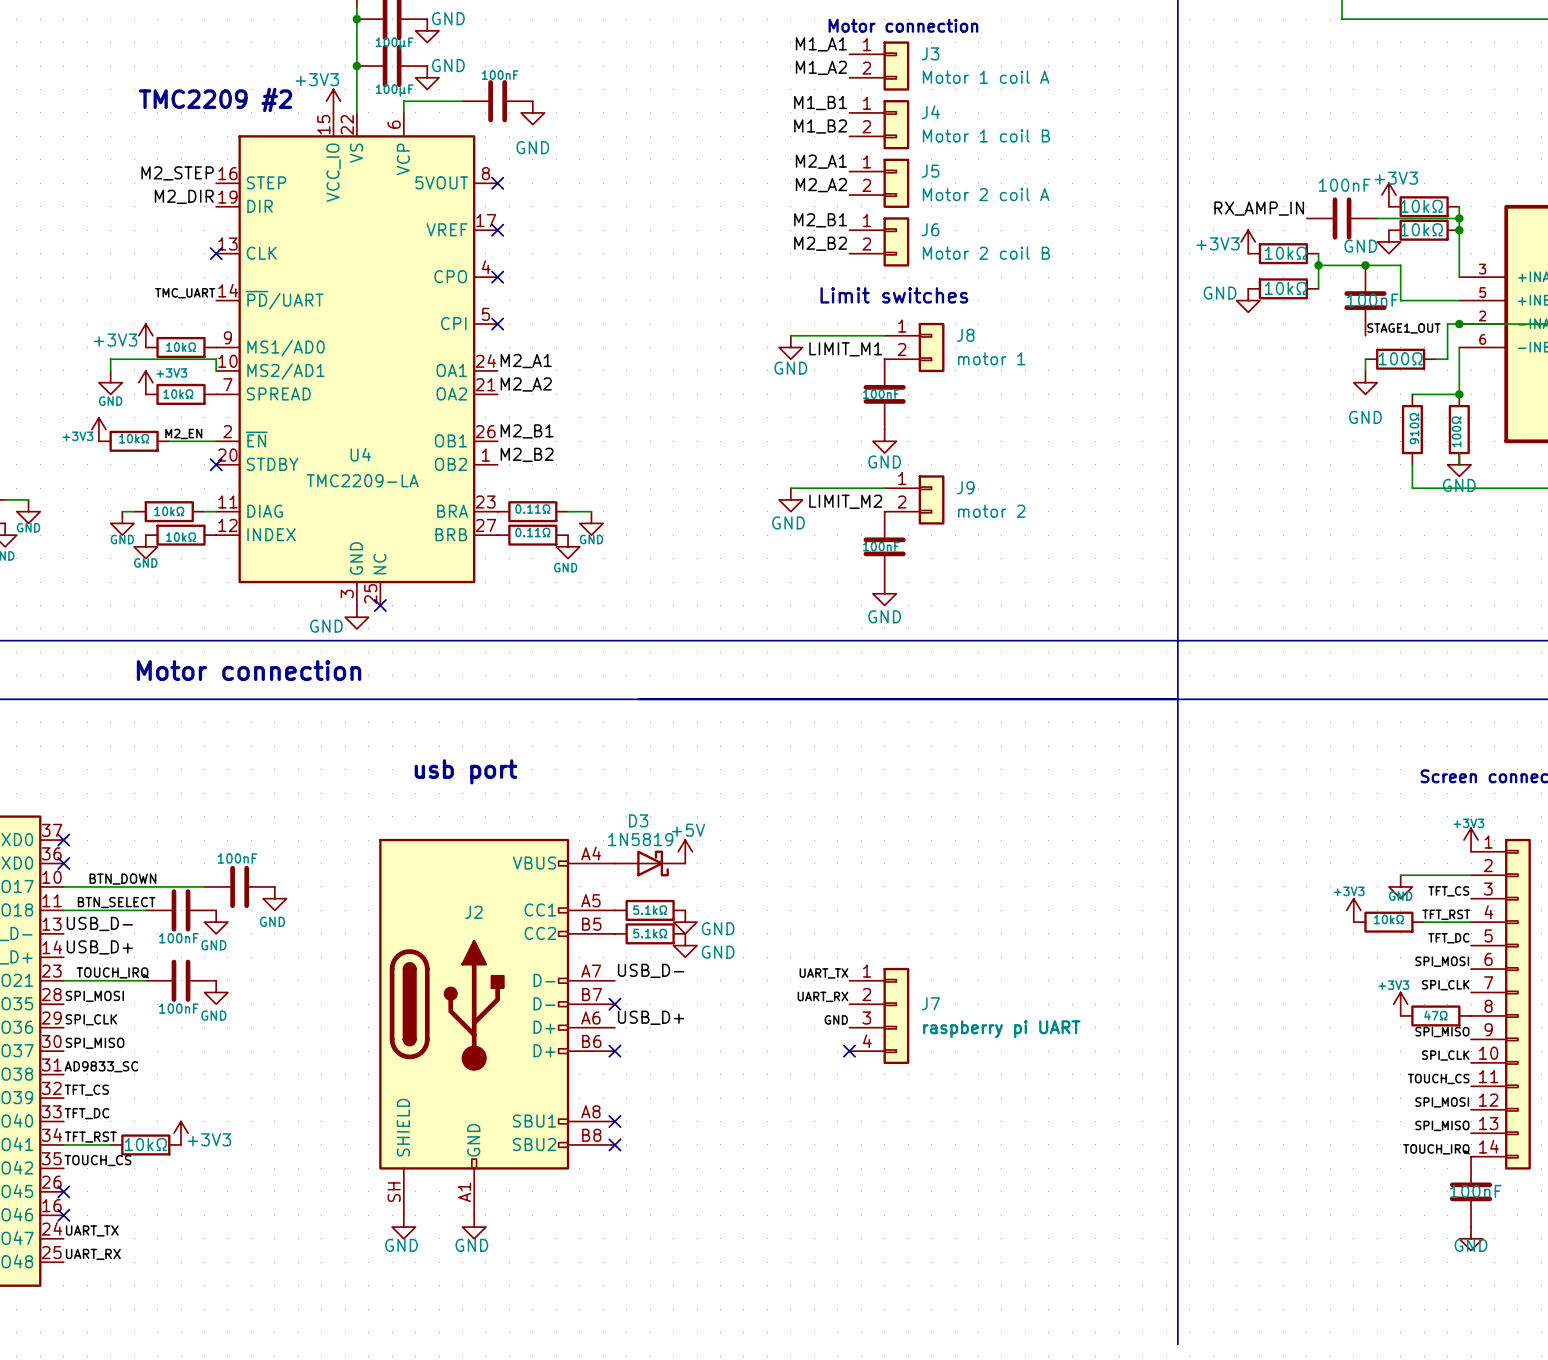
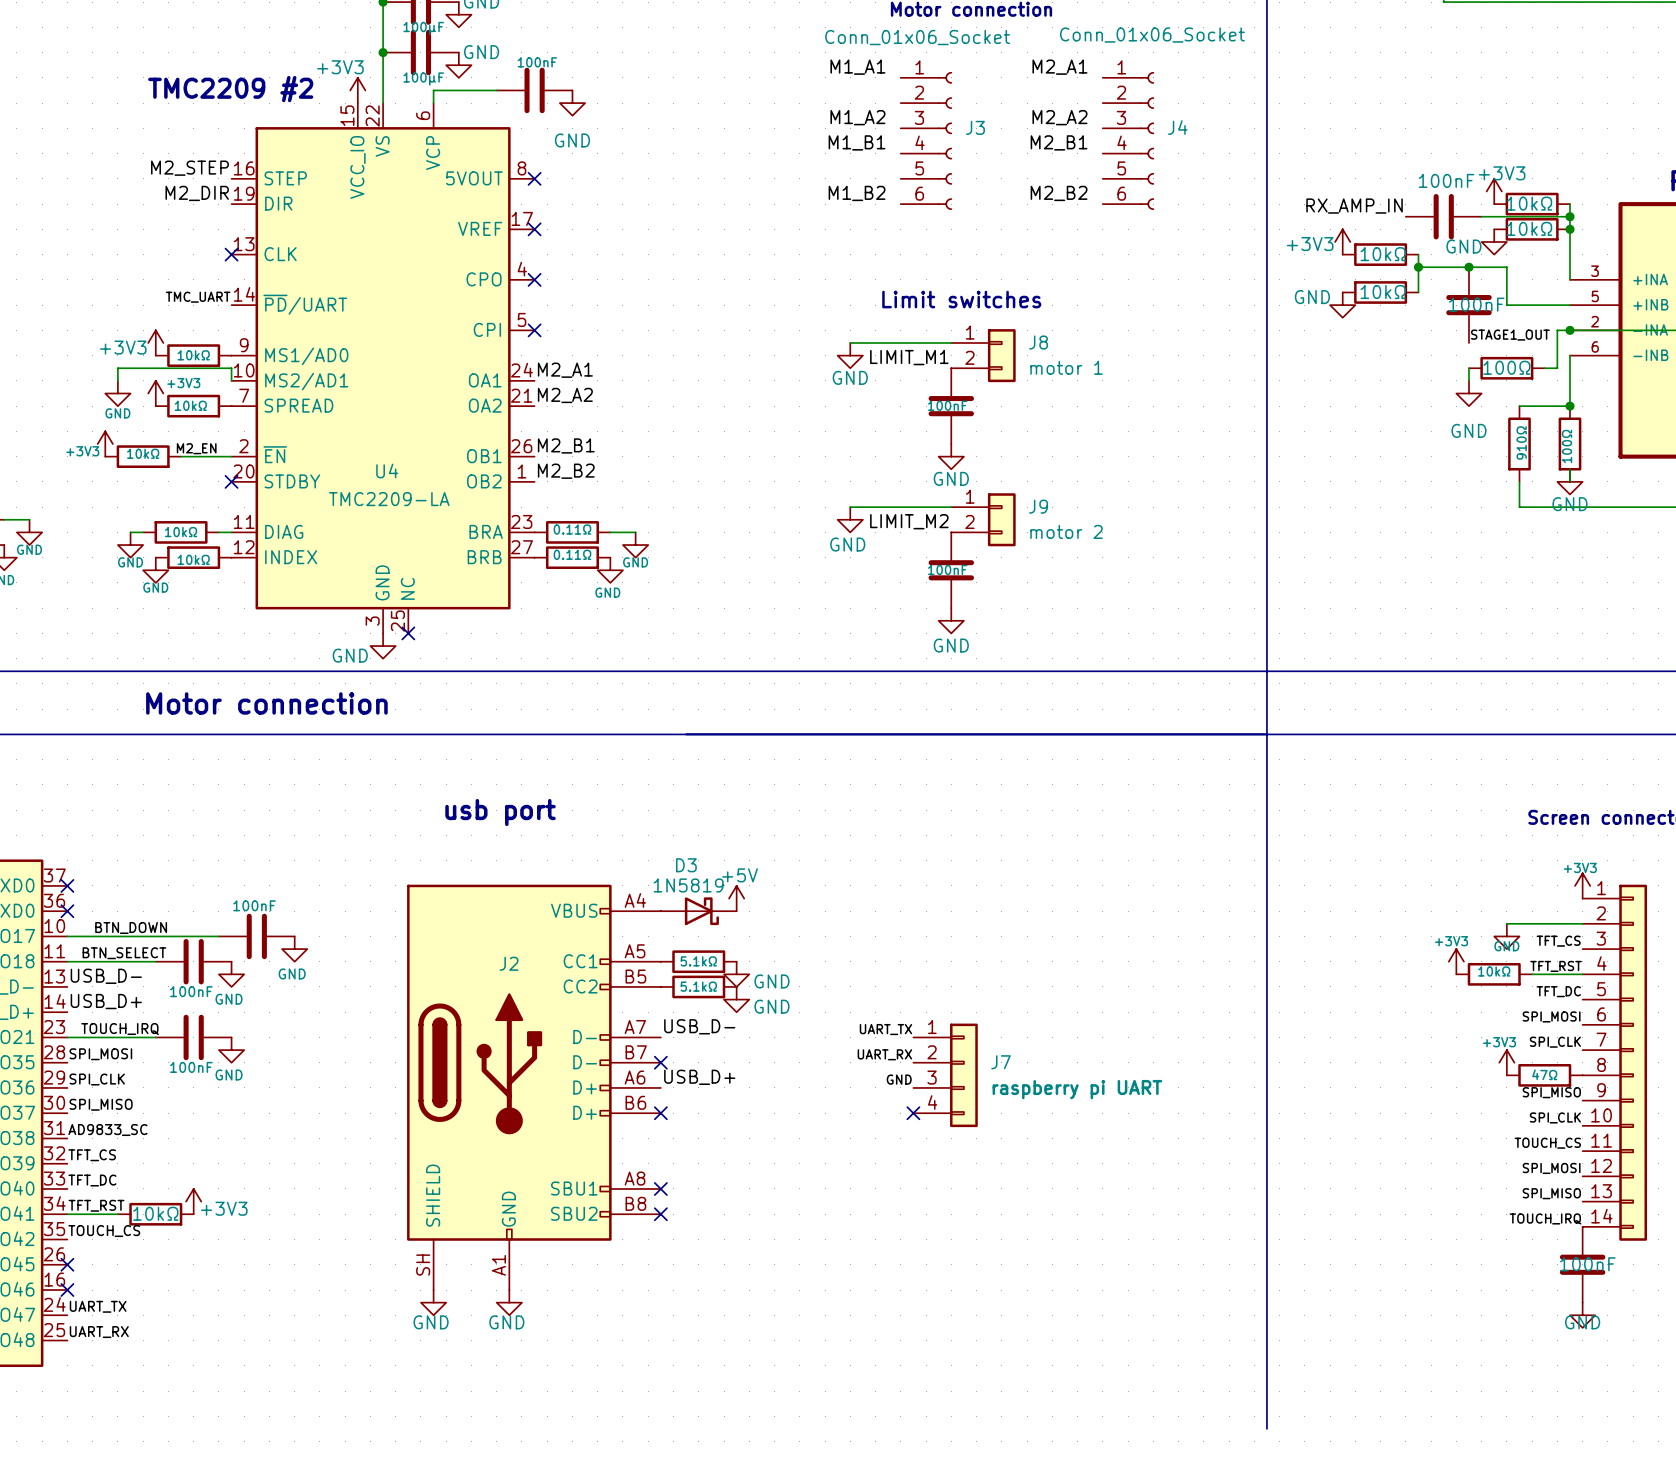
J3 symbol: [849, 41, 910, 91] -> [900, 72, 953, 210]
label position: M1_A1 (821, 44) -> M1_A1 (857, 67)
label position: M1_A2 (821, 67) -> M1_A2 (857, 117)
J3 value: Motor 1 coil A (986, 77) -> Conn_01x06_Socket (917, 37)
J4 symbol: [849, 100, 910, 150] -> [1102, 72, 1155, 210]
label position: M1_B1 (820, 103) -> M1_B1 (857, 142)
label position: M1_B2 (820, 126) -> M1_B2 (857, 193)
J4 value: Motor 1 coil B (986, 135) -> Conn_01x06_Socket (1152, 35)
label position: M2_A1 (821, 161) -> M2_A1 (1059, 67)
J5: Motor 2 coil A (879, 183) -> none
label position: M2_A2 (821, 185) -> M2_A2 (1059, 117)
label position: M2_B1 (820, 220) -> M2_B1 (1059, 142)
J6: Motor 2 coil B (879, 241) -> none
label position: M2_B2 (820, 243) -> M2_B2 (1059, 193)

